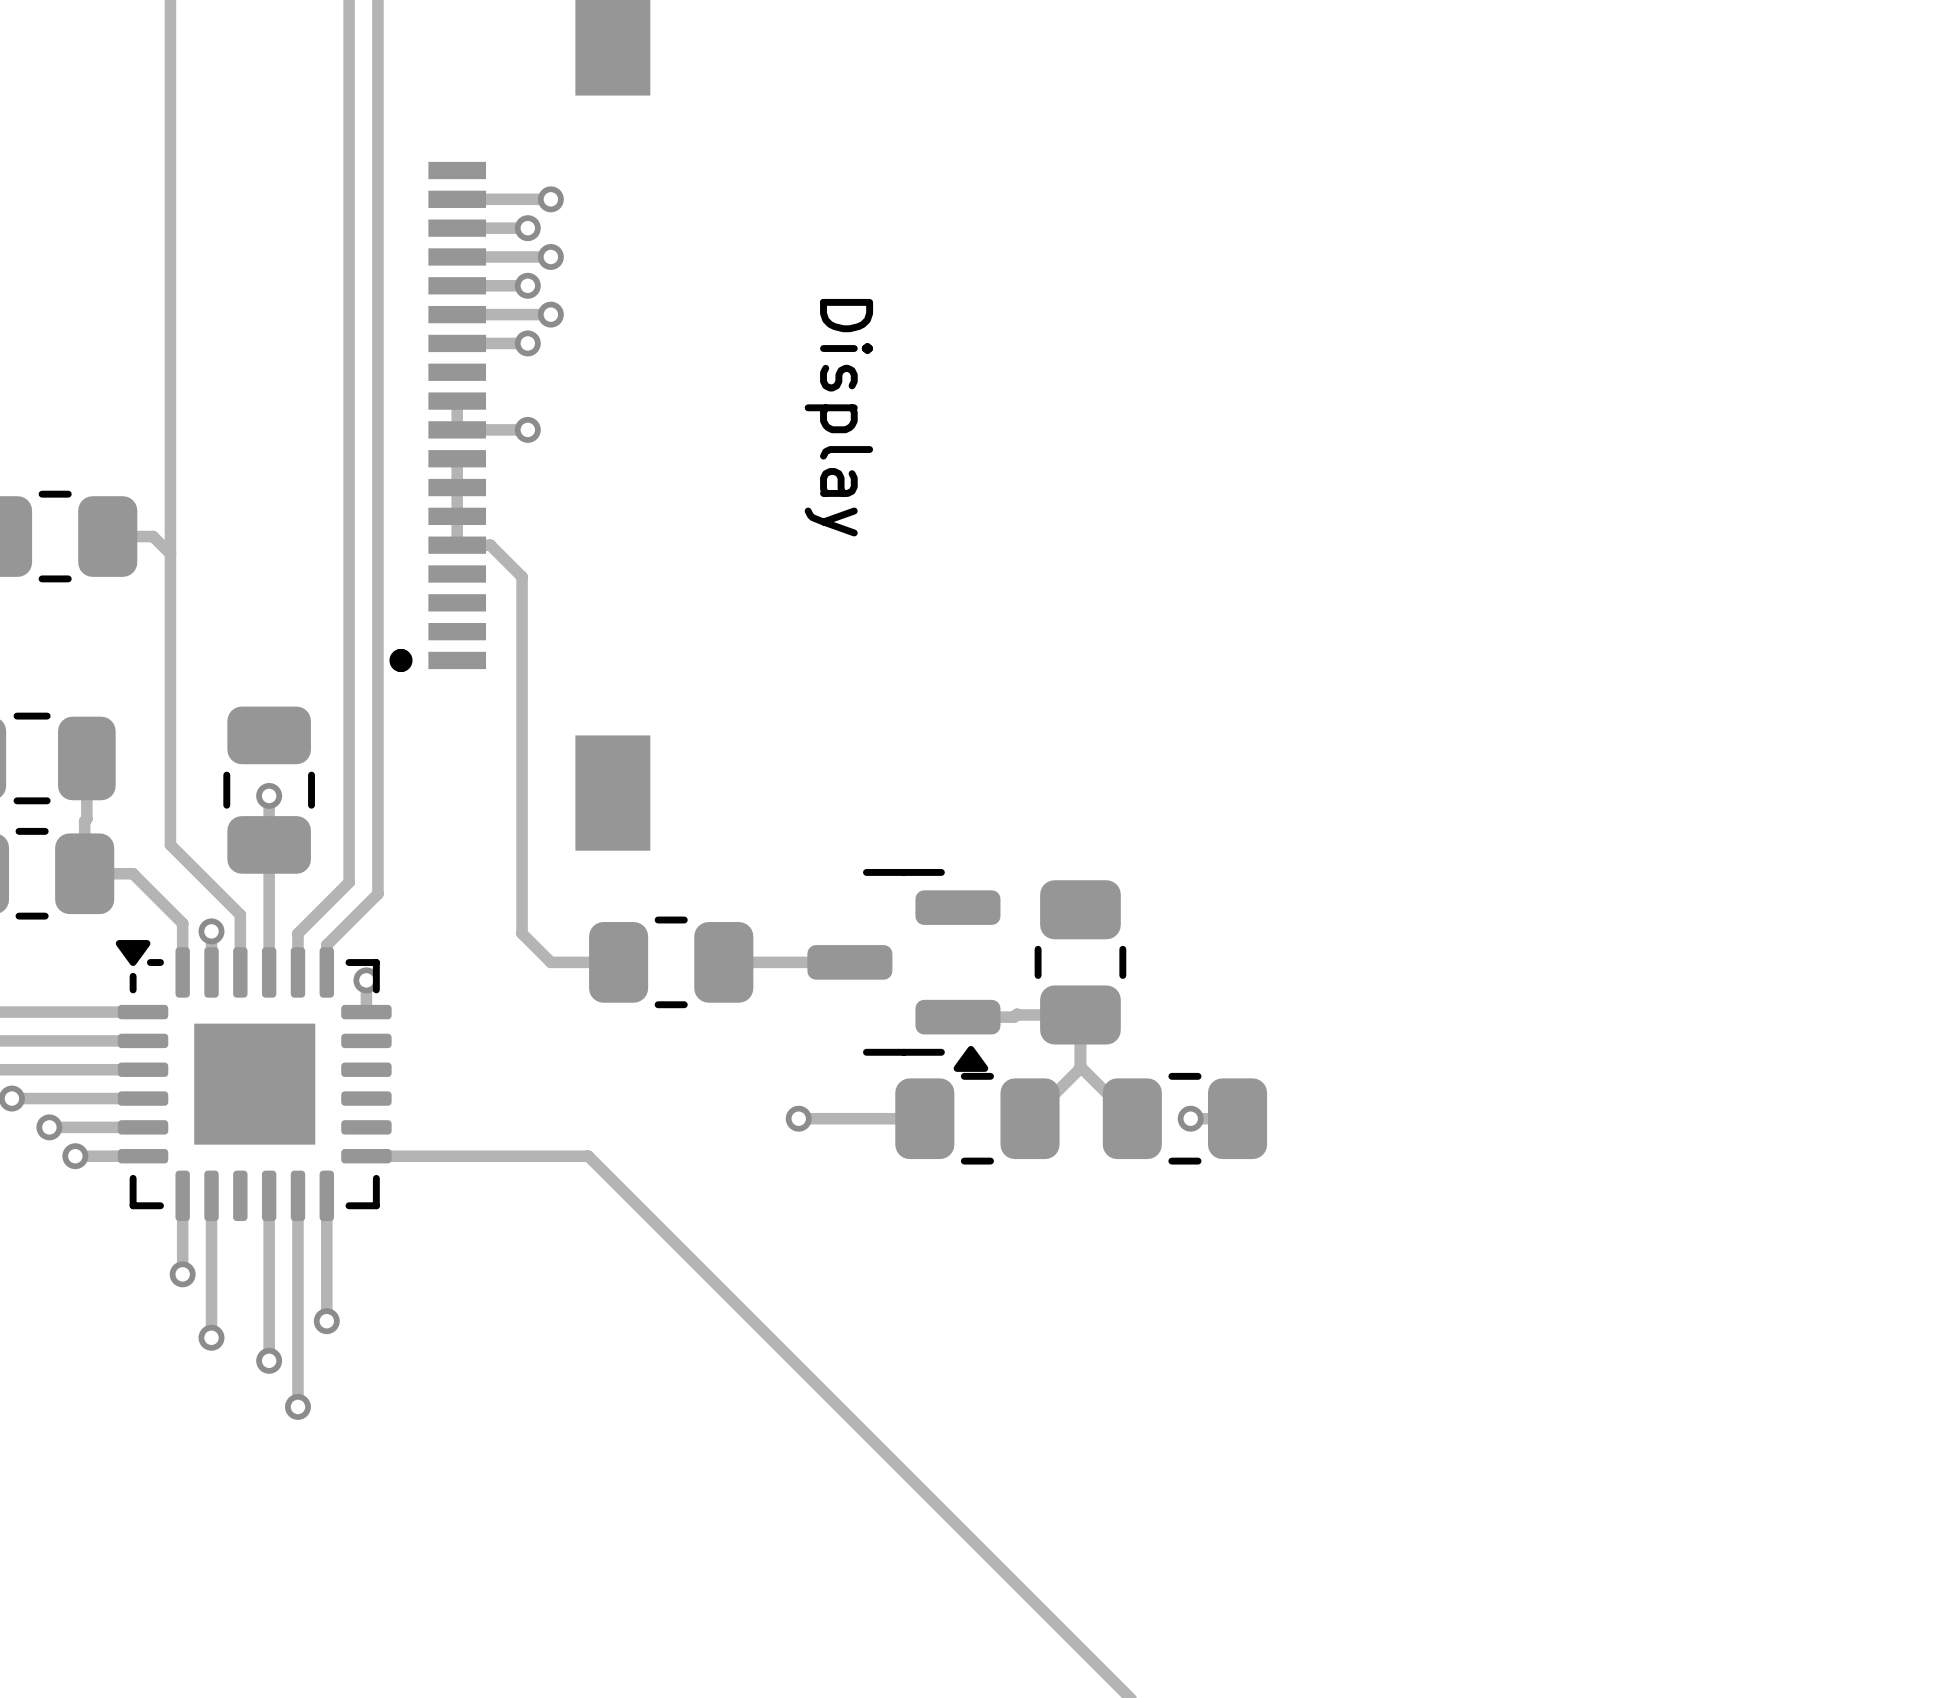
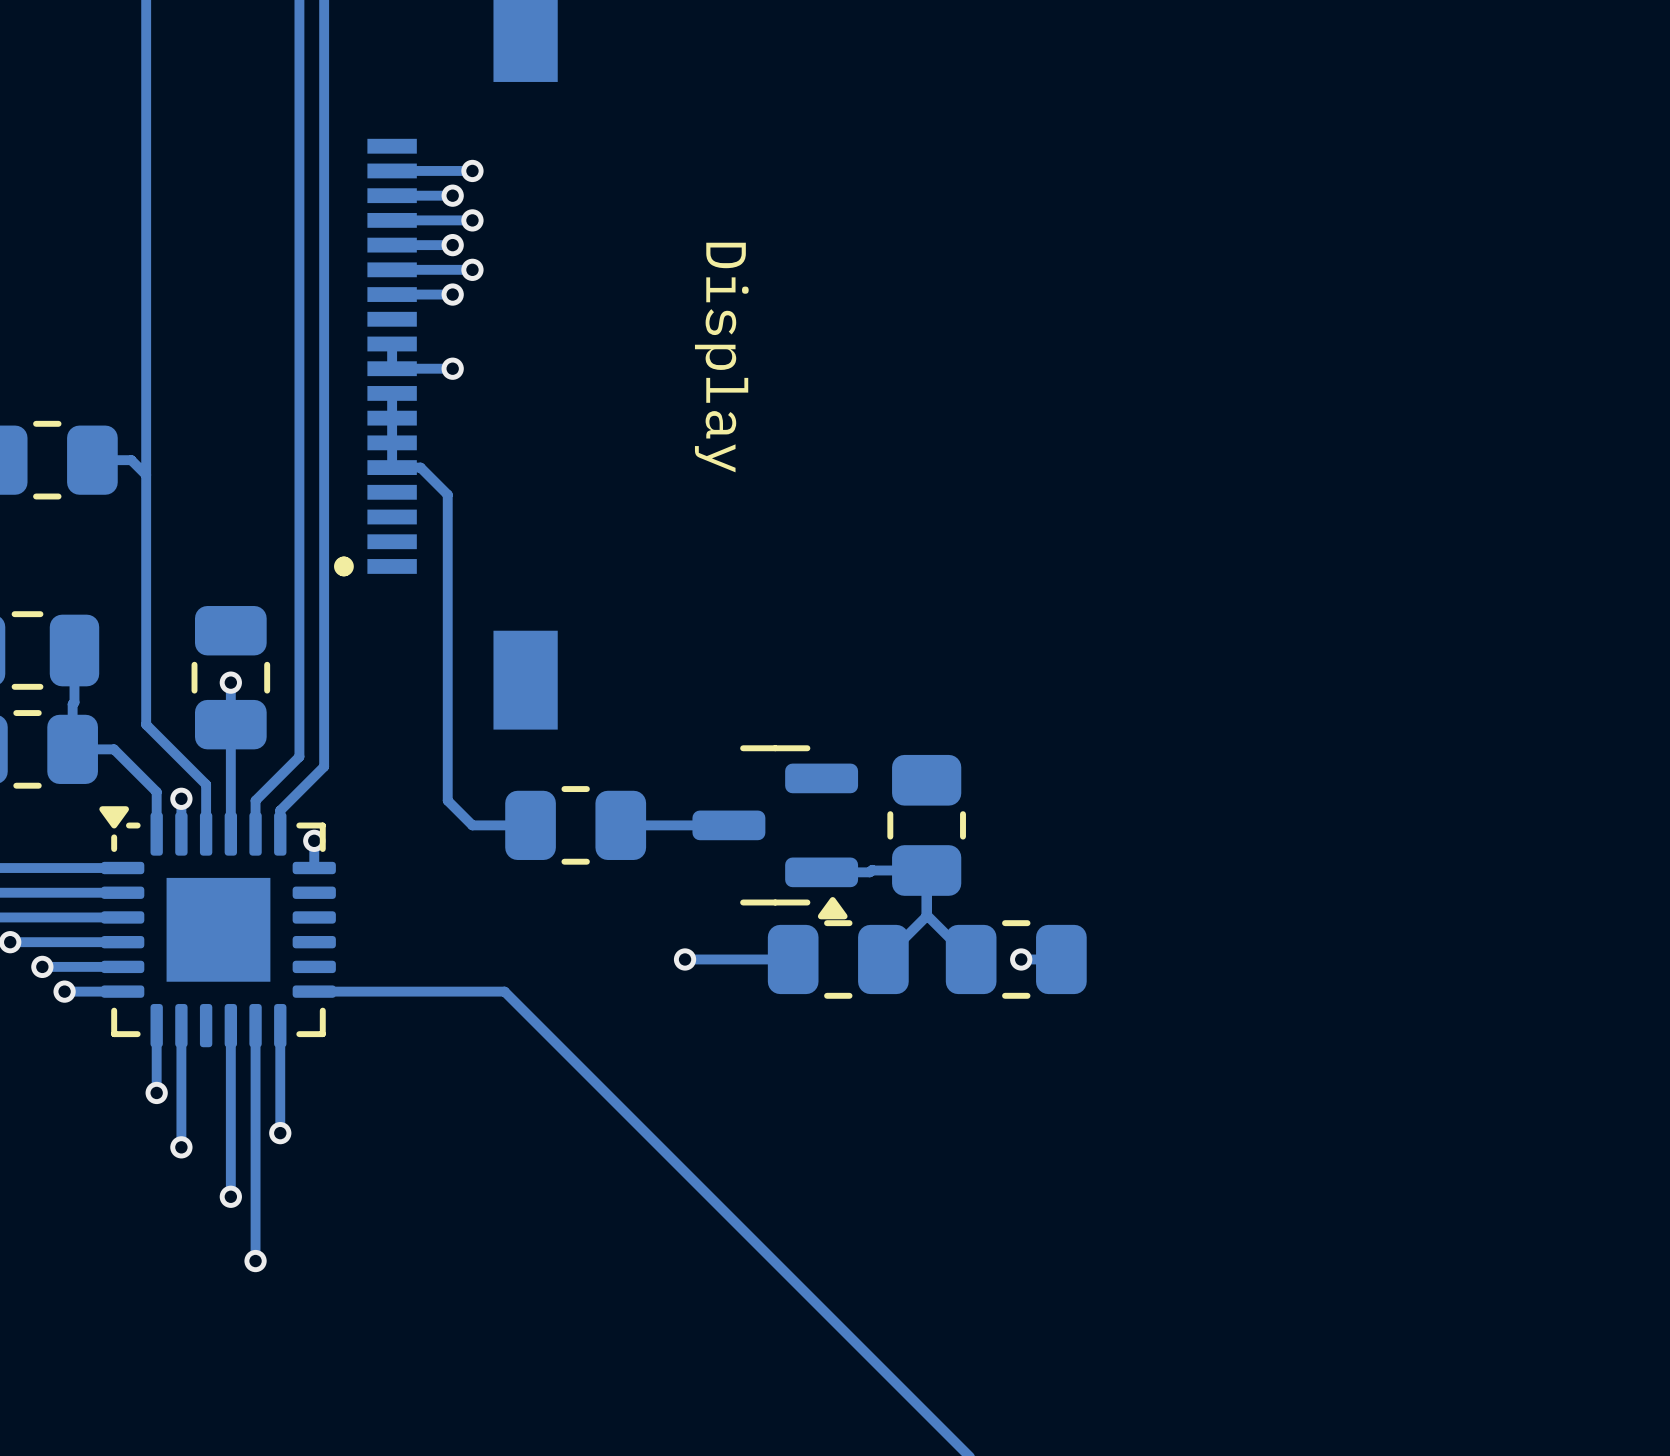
track: none -> (230, 1167) (230, 1196)
via: (269, 1360) -> none
via: none -> (230, 1196)
track: none -> (255, 1206) (255, 1261)
via: (297, 1406) -> none
via: none -> (255, 1261)

